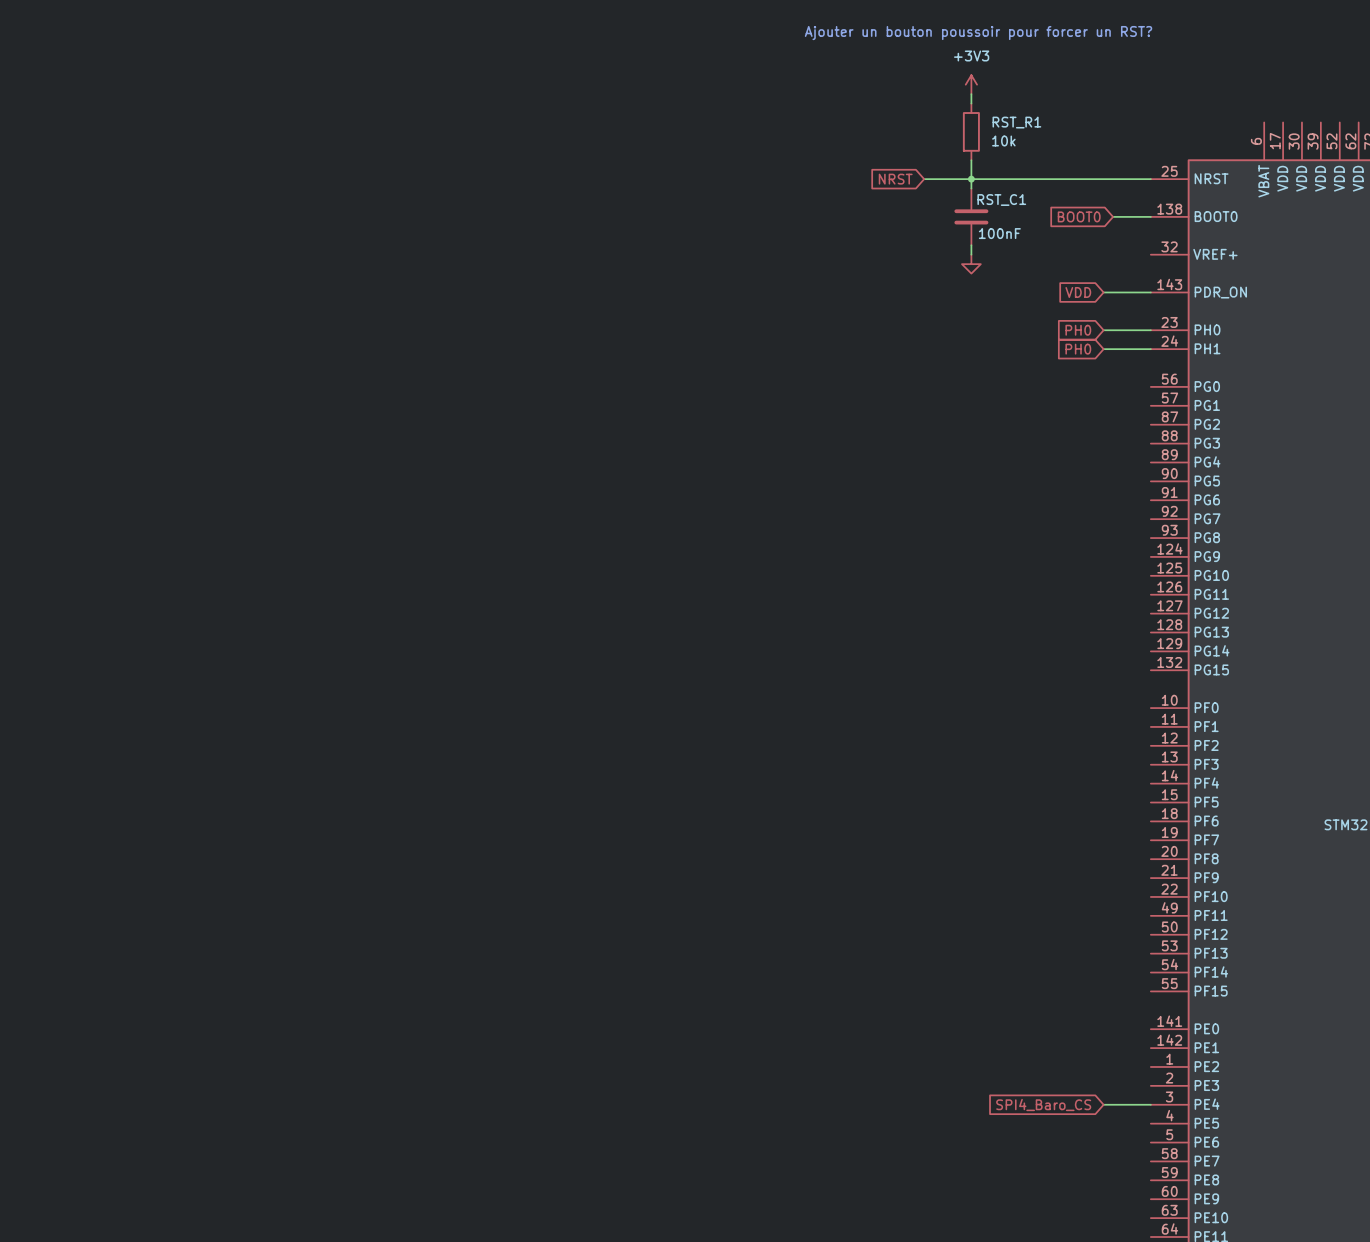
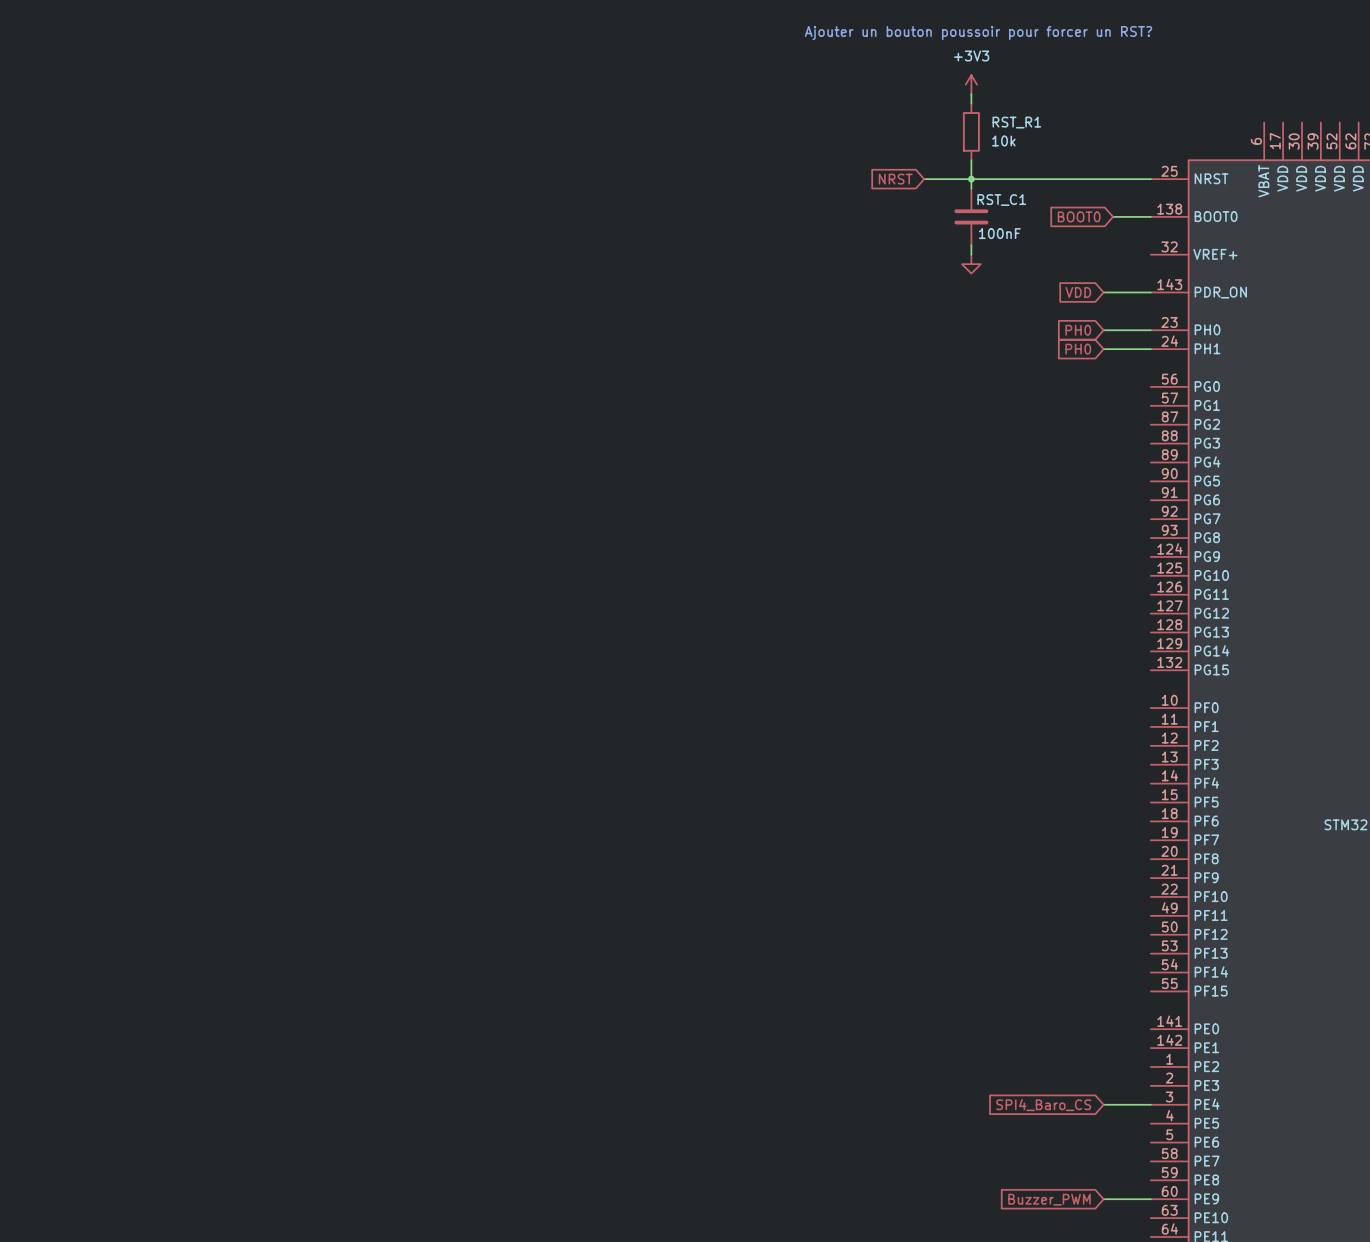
global label: none -> Buzzer_PWM (1049, 1199)
wire: none -> (1103, 1199) (1150, 1199)

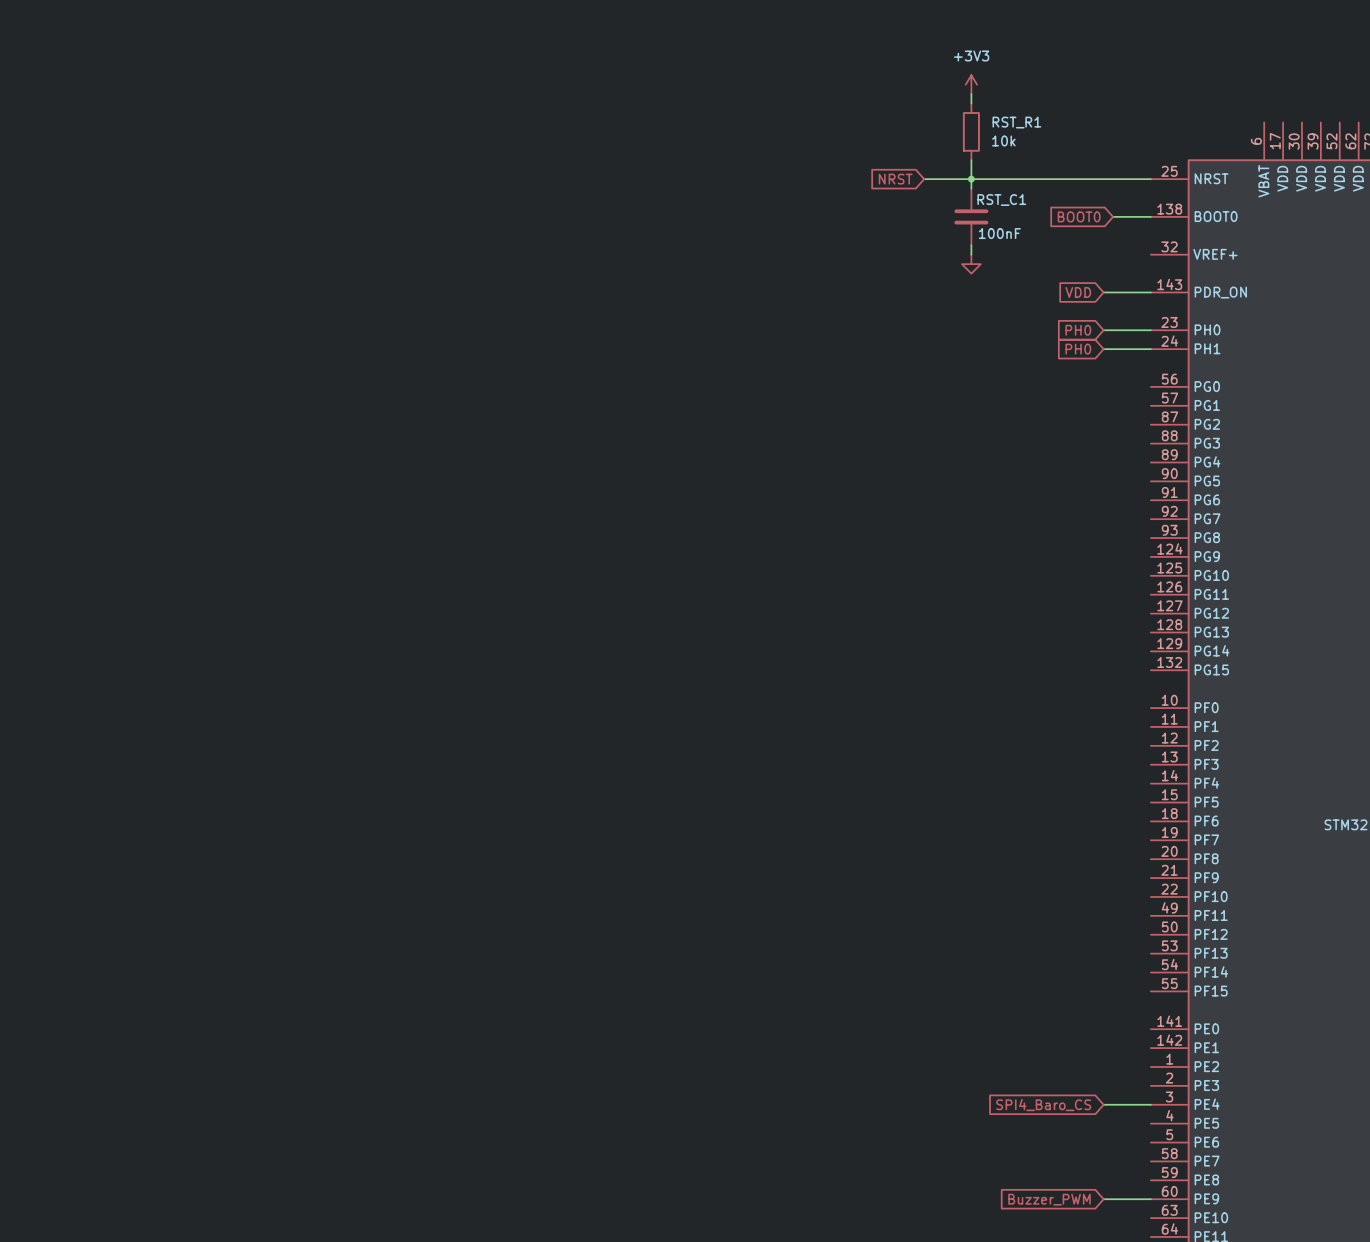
text: Ajouter un bouton poussoir pour forcer un RST? (978, 33) -> none

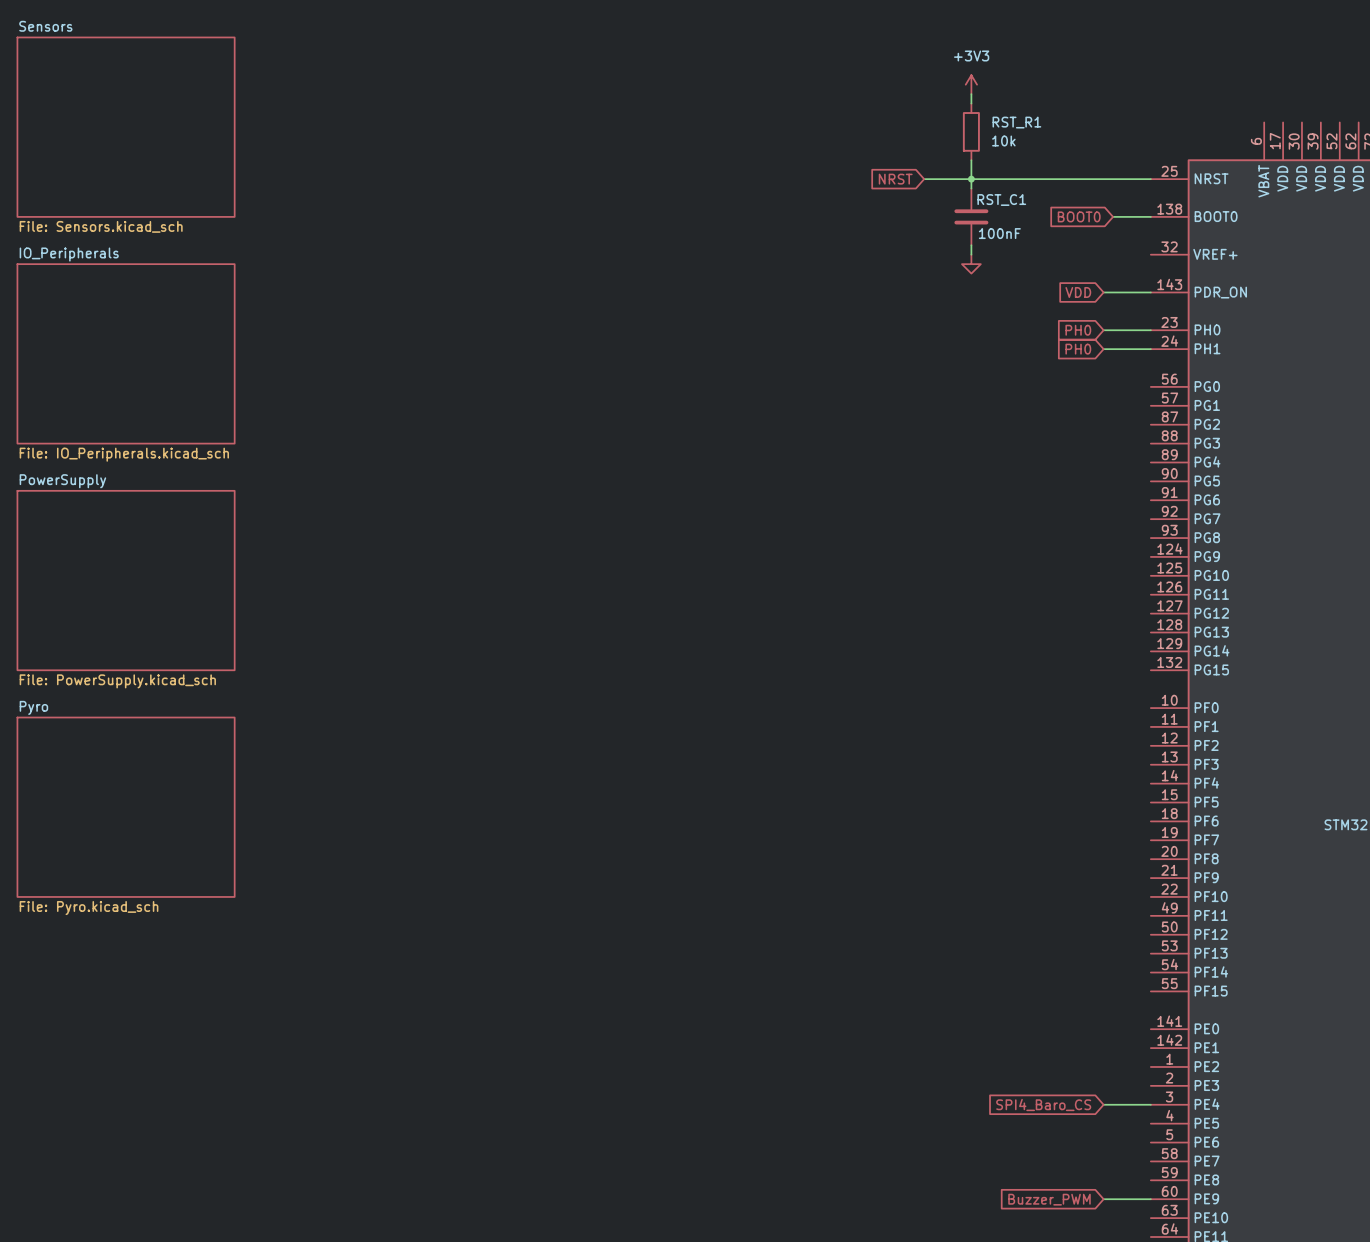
sheet Sensors: none -> File: Sensors.kicad_sch (126, 127)
sheet IO_Peripherals: none -> File: IO_Peripherals.kicad_sch (126, 353)
sheet PowerSupply: none -> File: PowerSupply.kicad_sch (126, 580)
sheet Pyro: none -> File: Pyro.kicad_sch (126, 807)

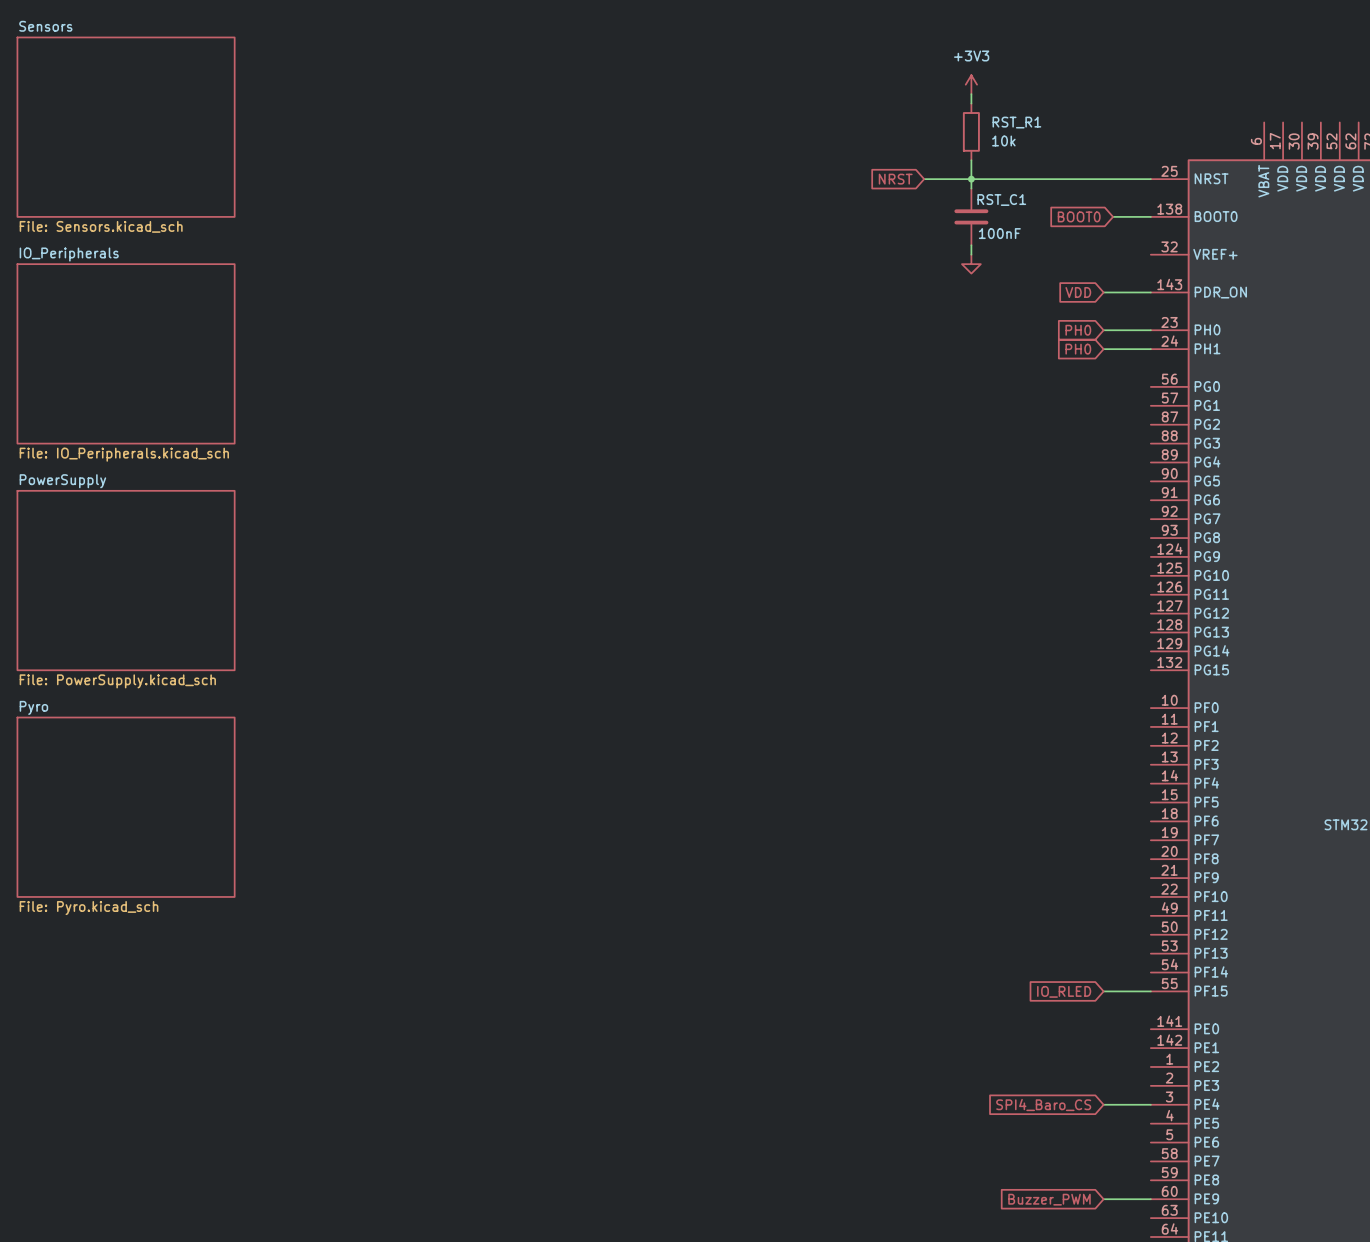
global label: none -> IO_RLED (1064, 991)
wire: none -> (1103, 991) (1150, 991)

